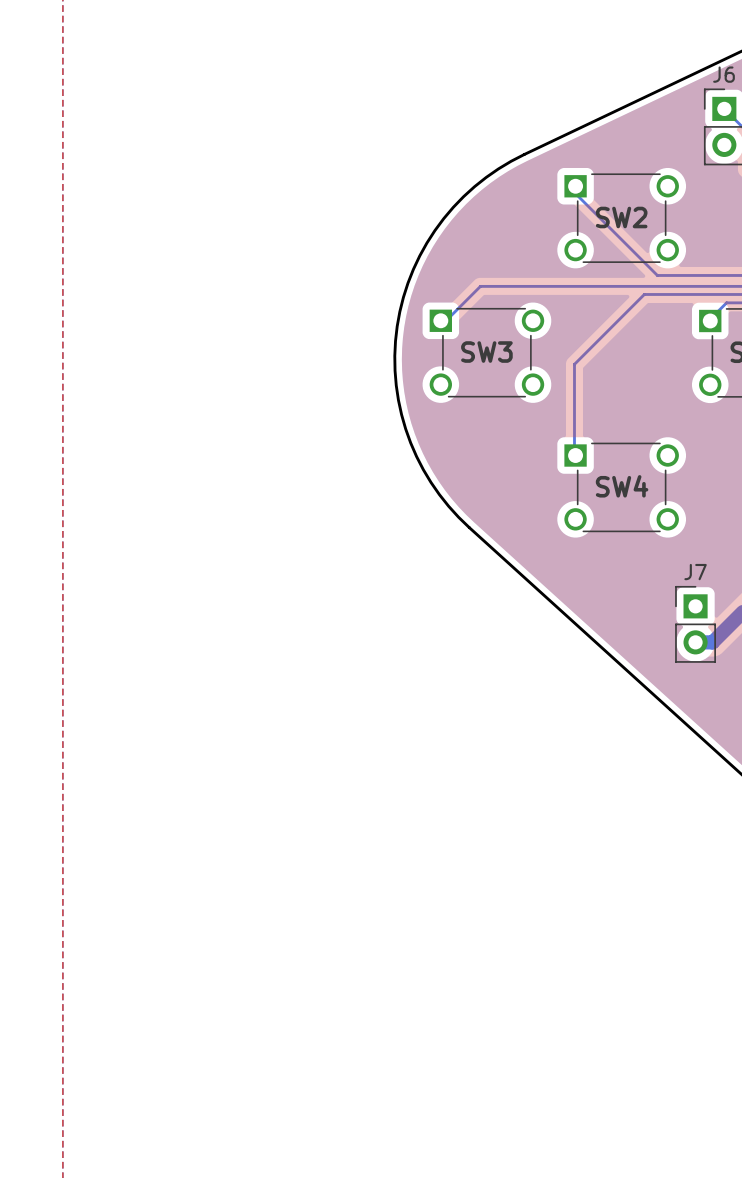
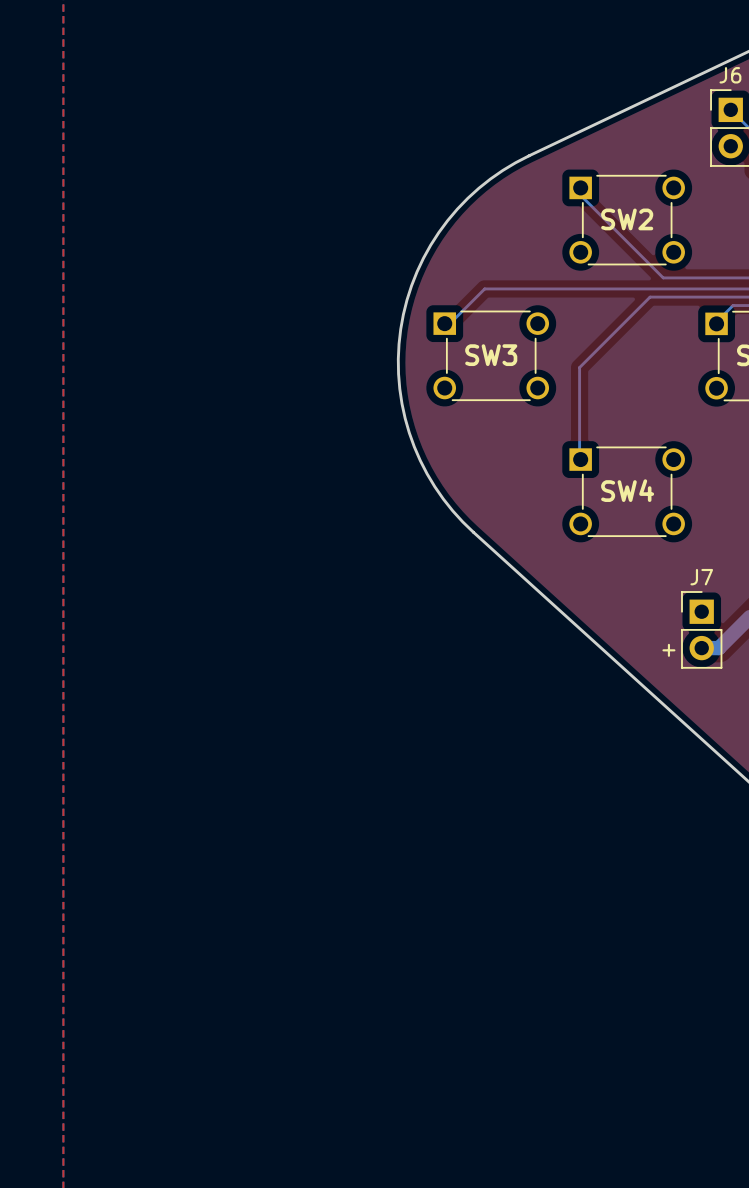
text: none -> + (668, 650)

